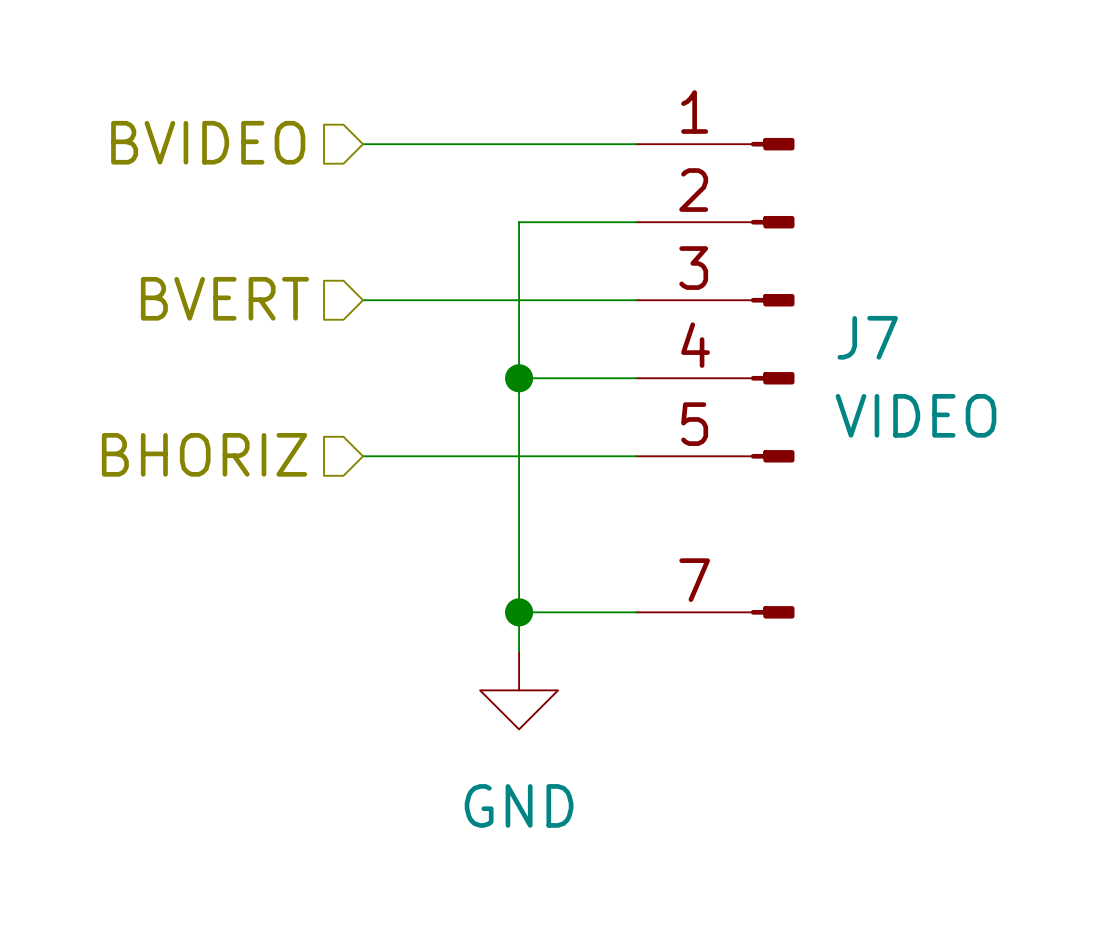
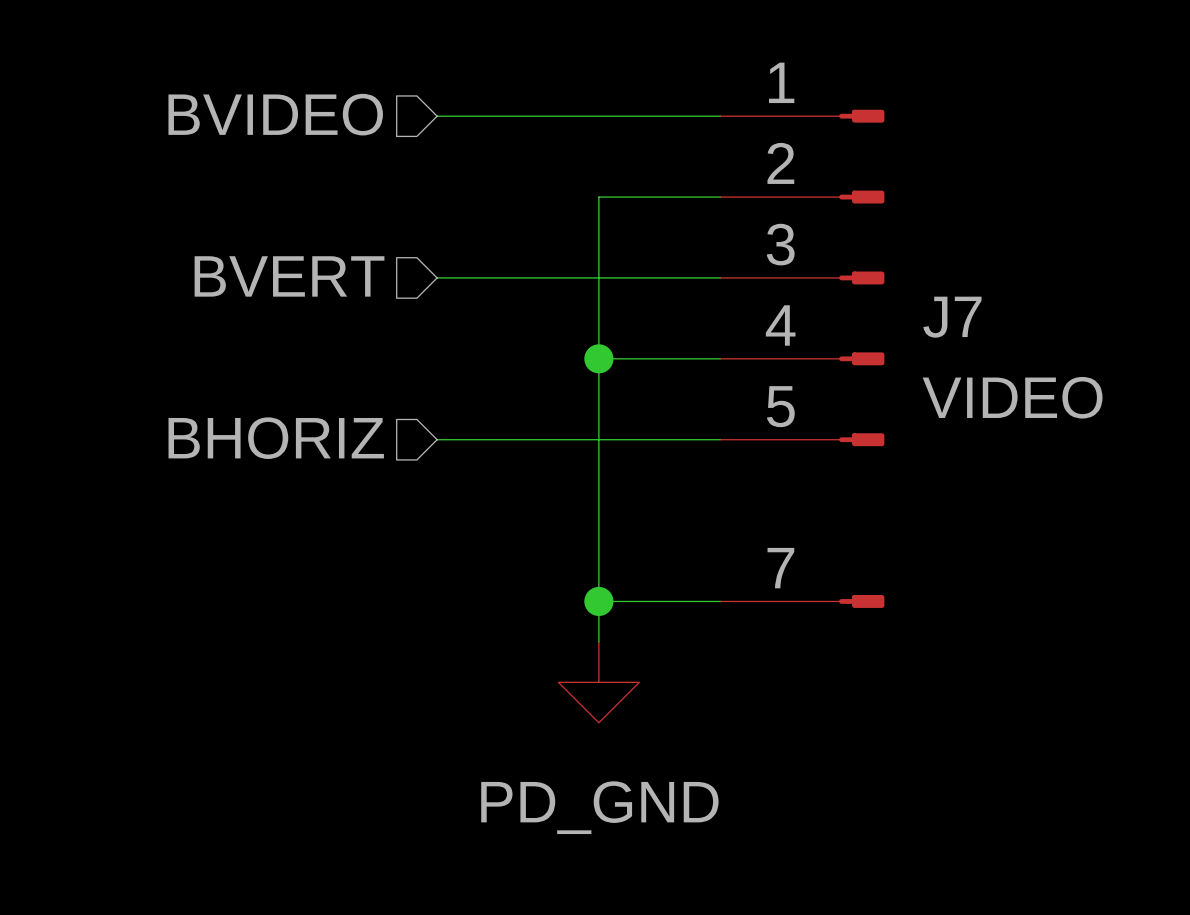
power symbol: GND (519, 690) -> PD_GND (598, 682)

